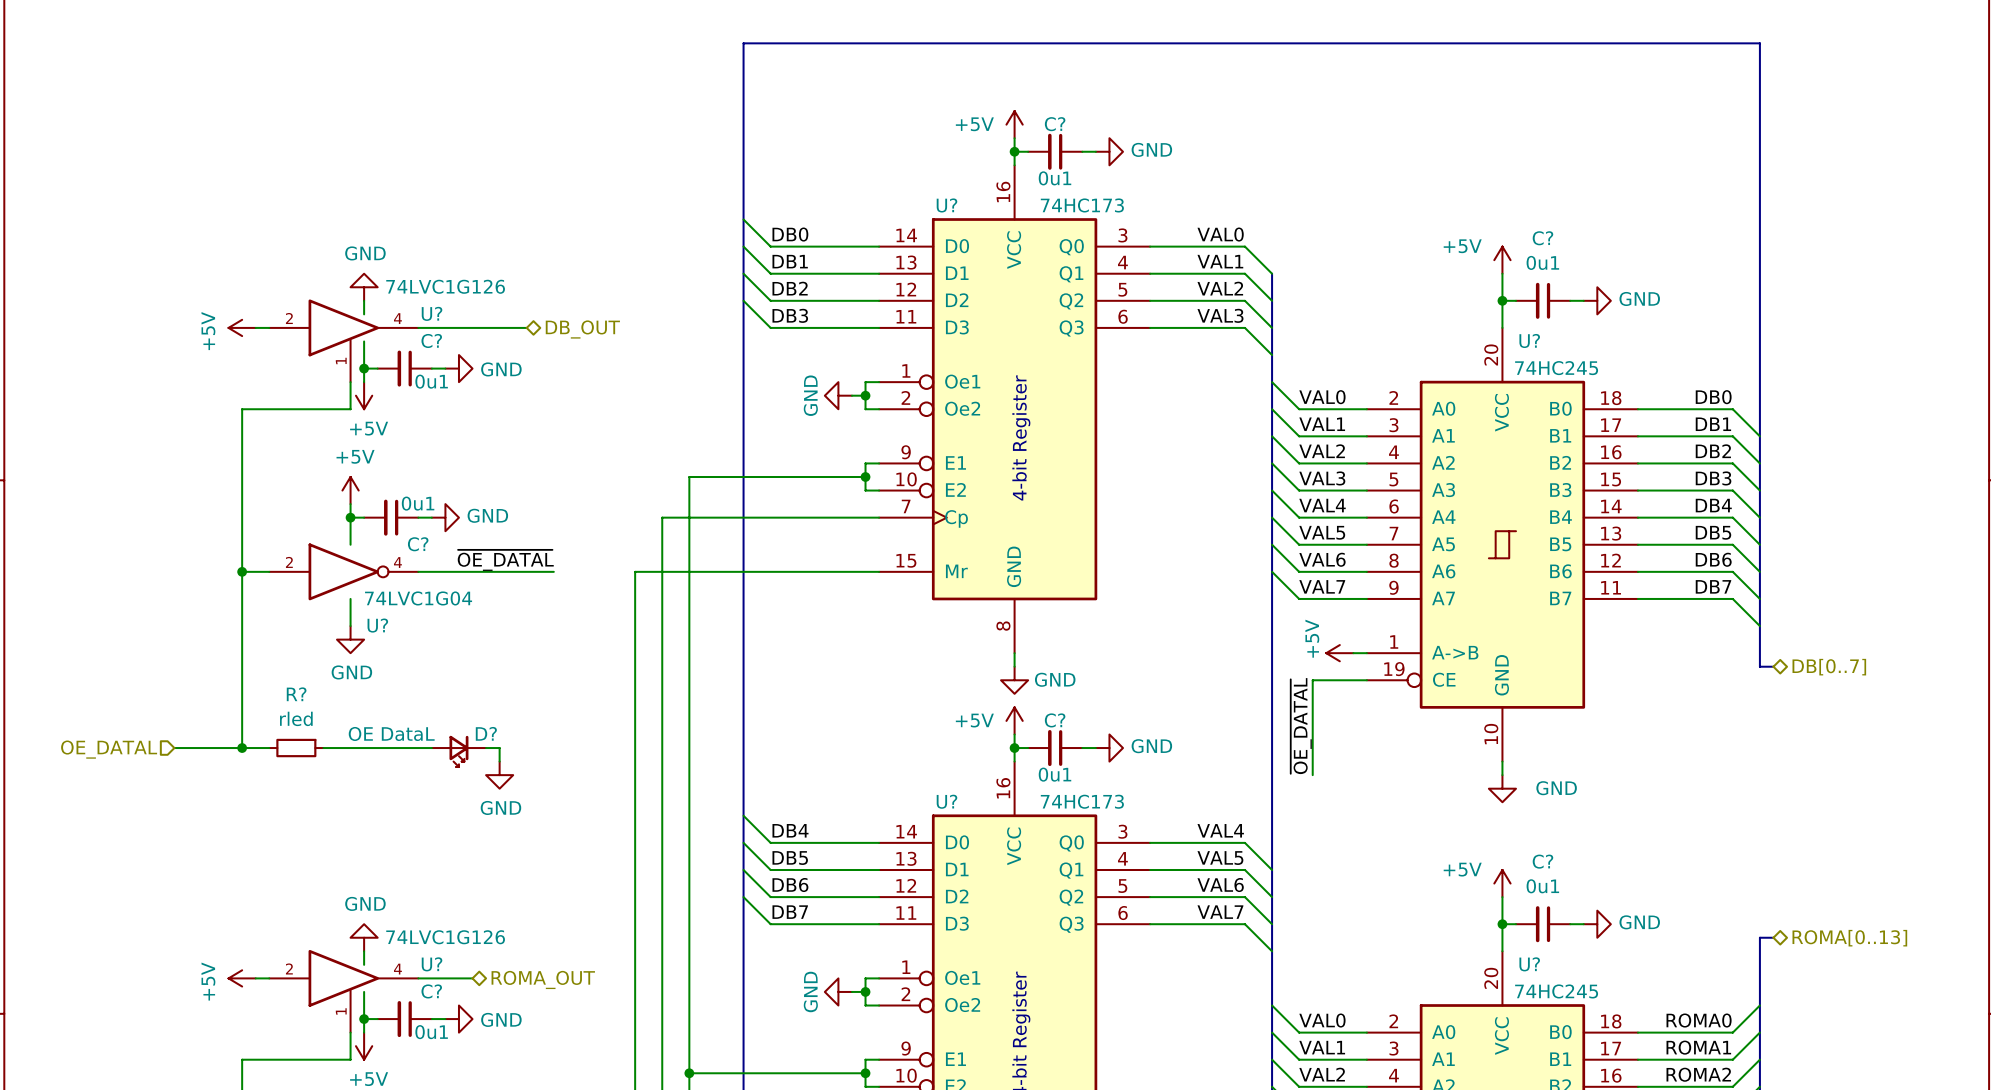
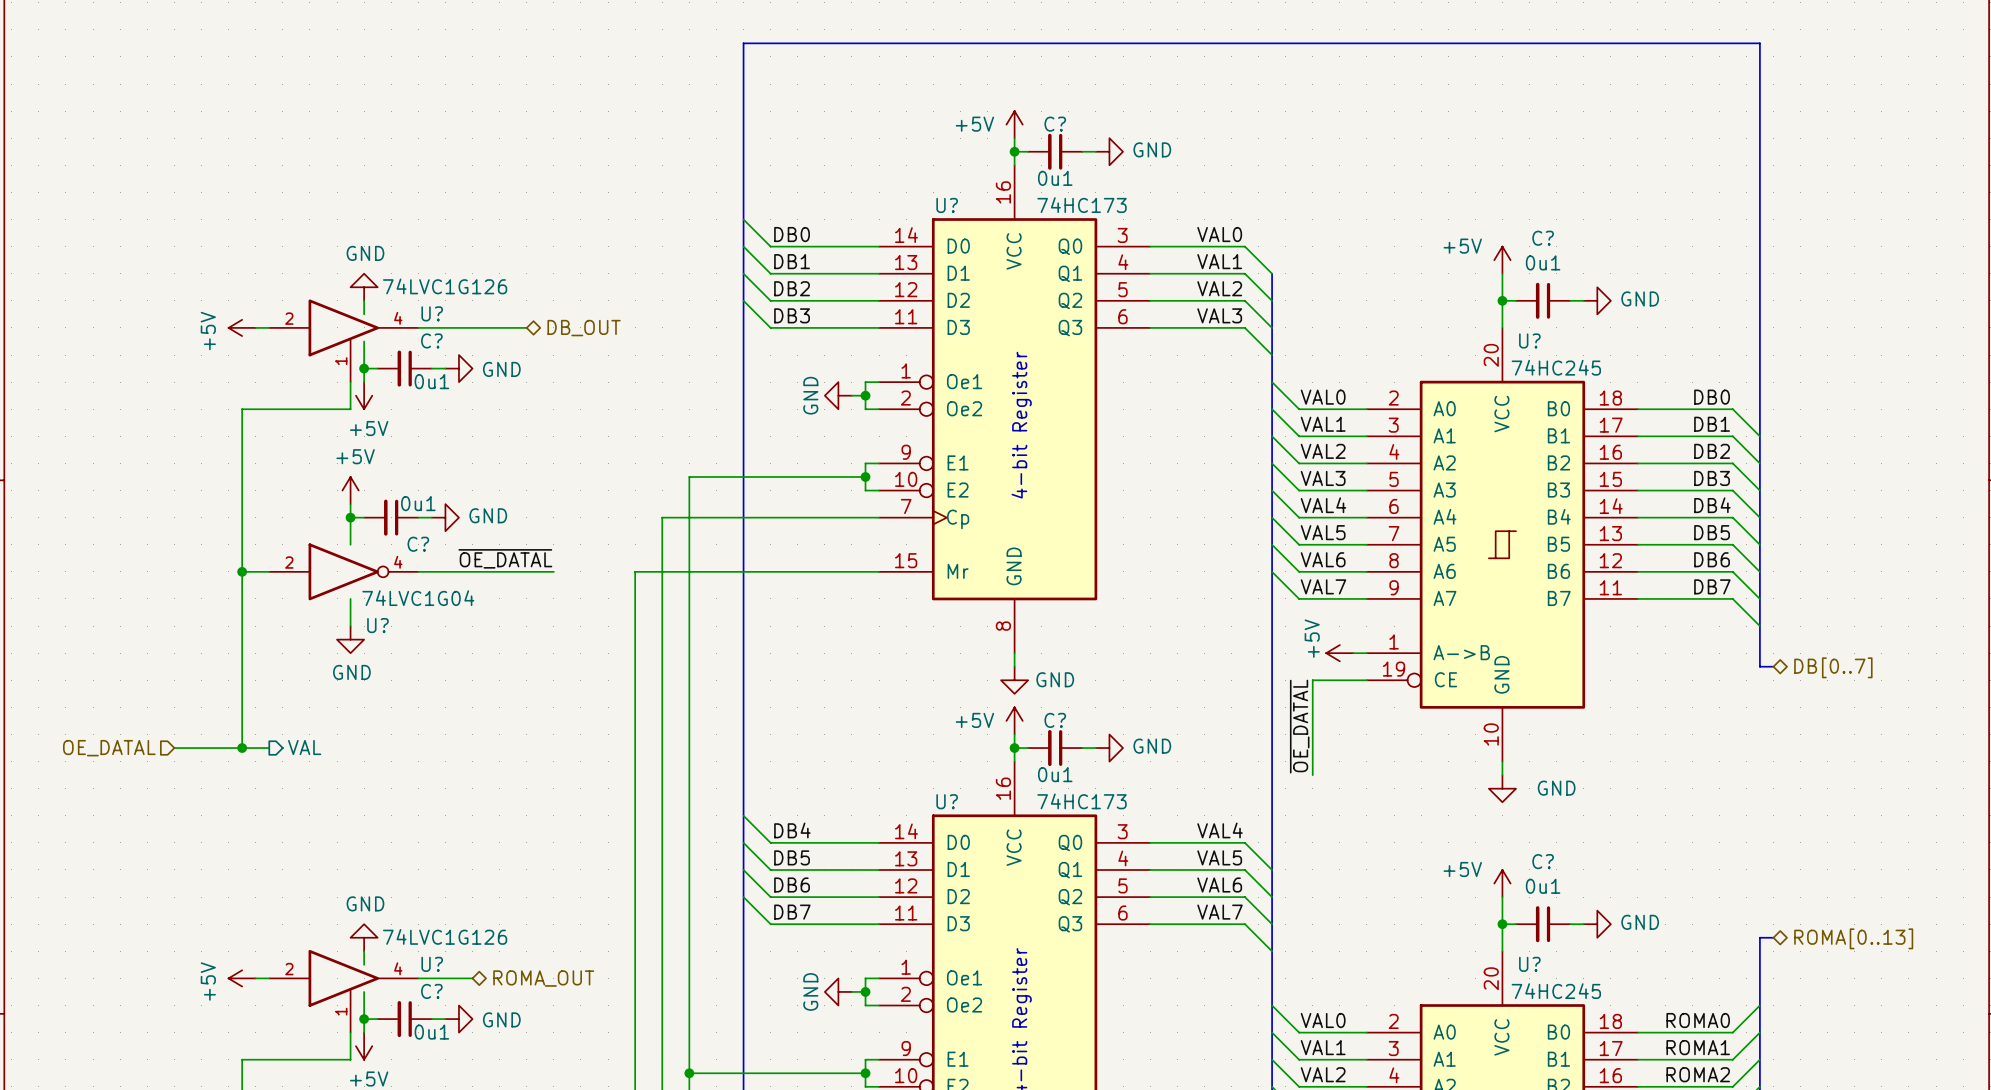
sheet pin: none -> VAL (304, 747)
R?: rled (296, 748) -> none
wire: (323, 748) (431, 748) -> none
wire: (486, 748) (499, 748) (499, 761) -> none
D?: OE DataL (458, 751) -> none
power symbol: GND (499, 775) -> none

